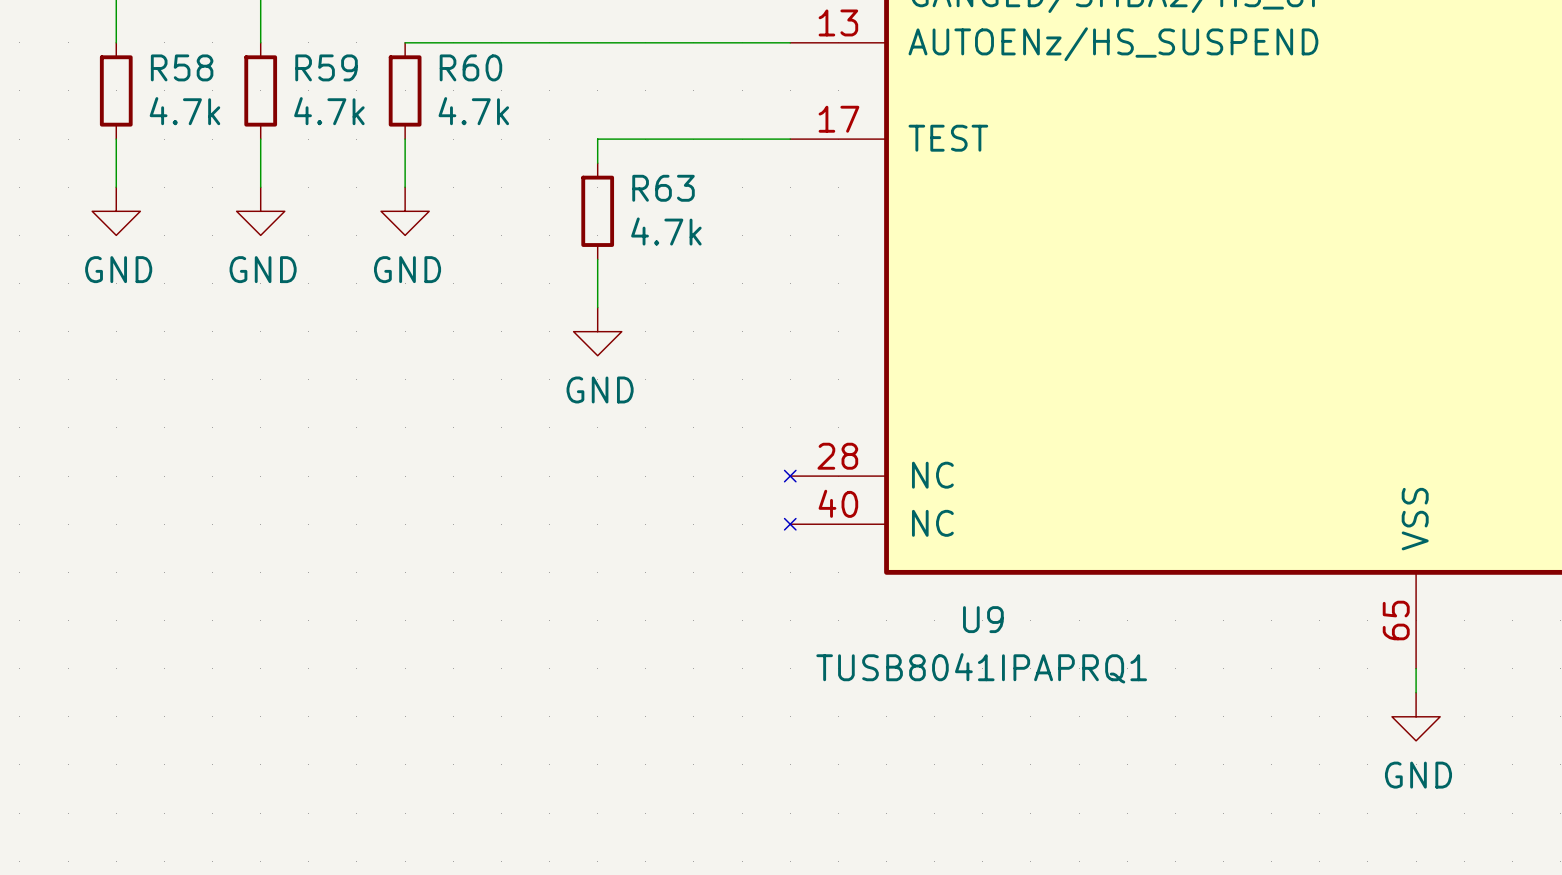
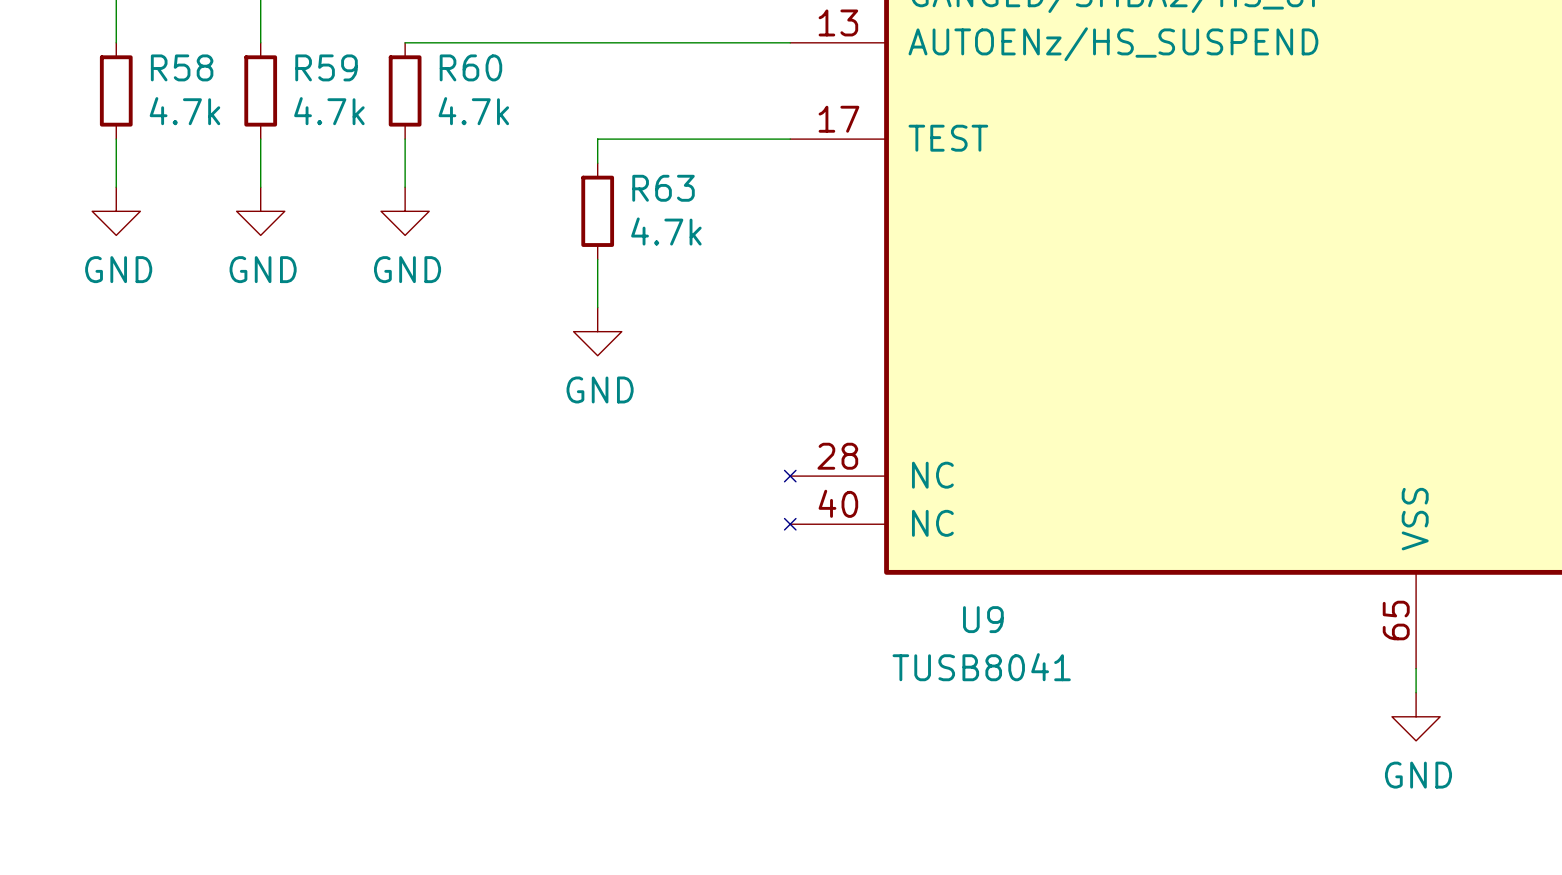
U9 value: TUSB8041IPAPRQ1 (981, 668) -> TUSB8041 (981, 667)

